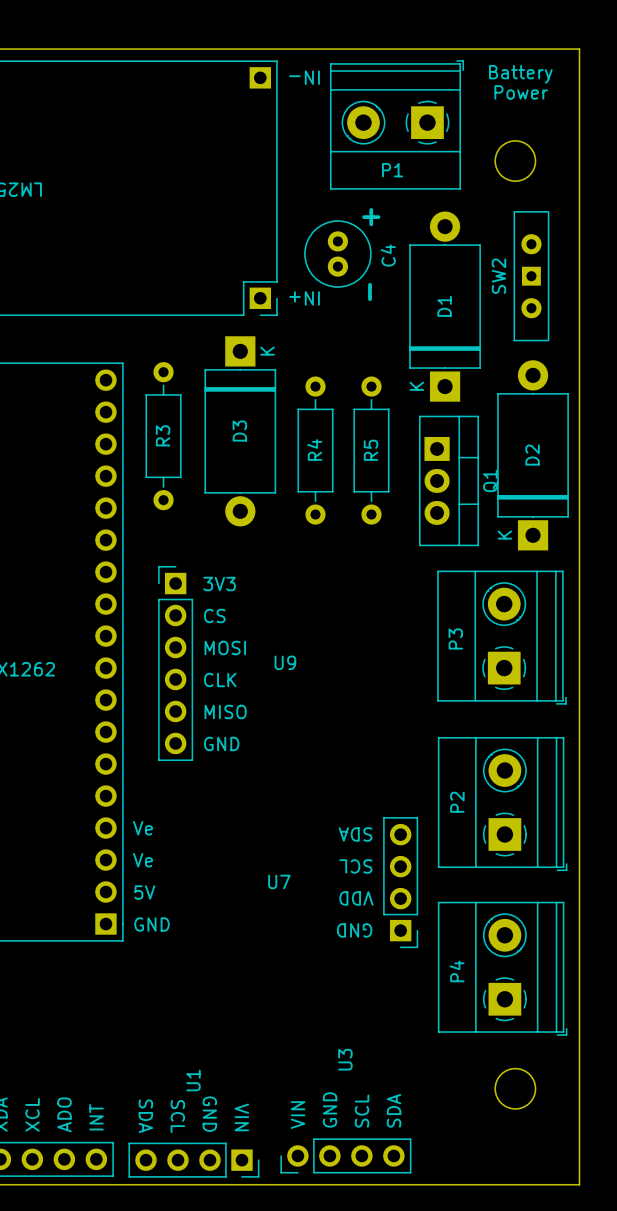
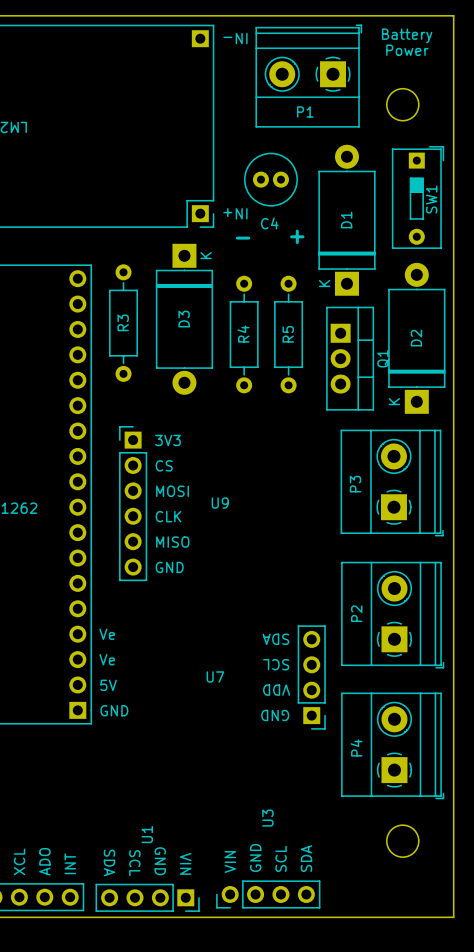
text position: + (371, 217) -> + (297, 236)
C4 rotation: 0° (337, 254) -> 90° clockwise (270, 179)
SW2: (531, 276) -> none
SW1: none -> (418, 197)
text rotation: 0° (369, 291) -> 90° clockwise (243, 238)
text position: - (369, 291) -> - (243, 238)

